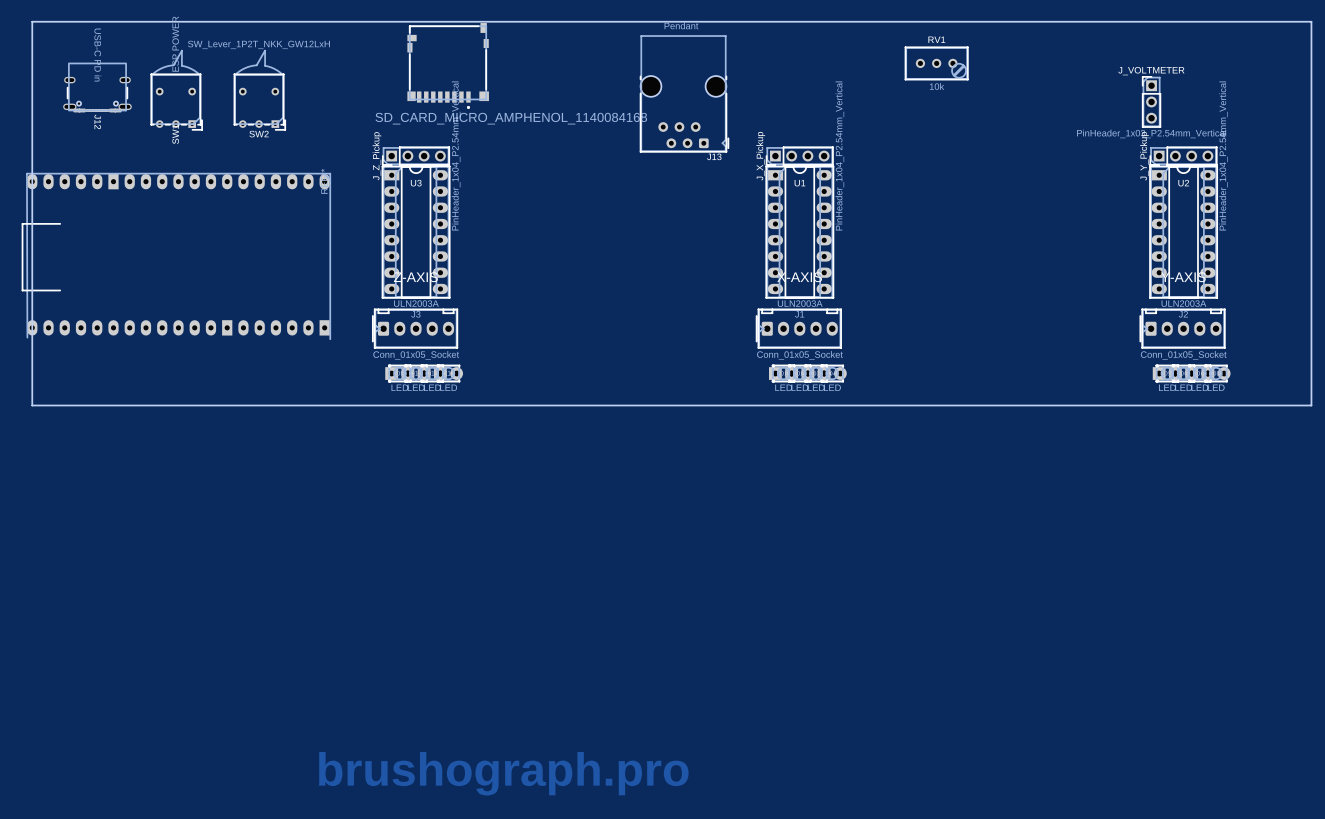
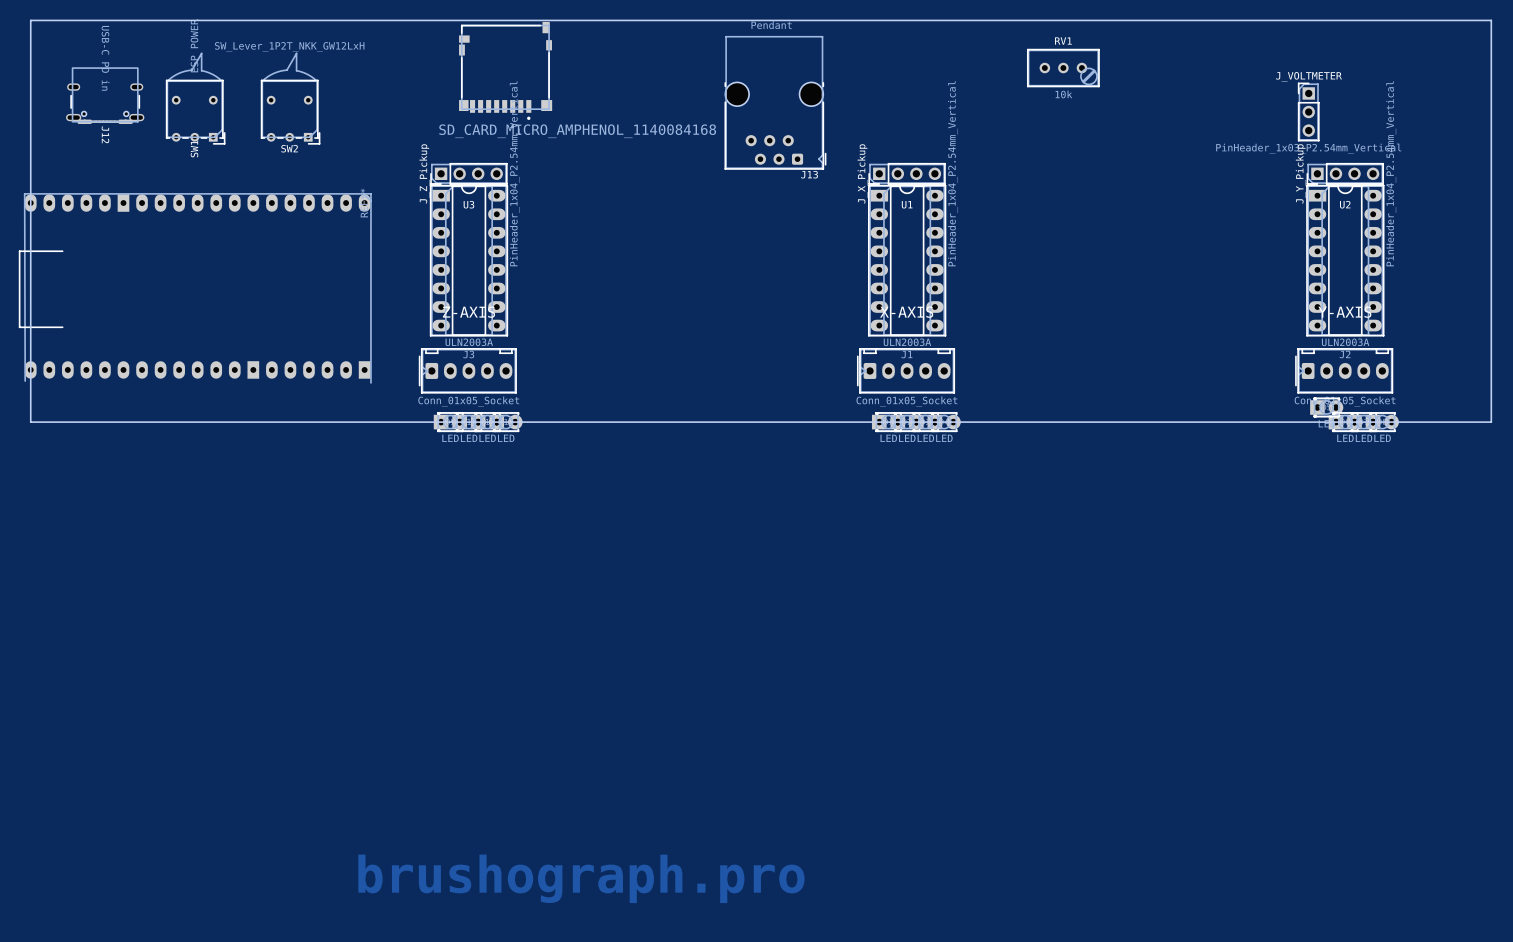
board edge: (32, 373) (32, 405) (1311, 405) (1311, 373) -> (30, 422) (1491, 422)
part position: (1167, 373) -> (1326, 407)

